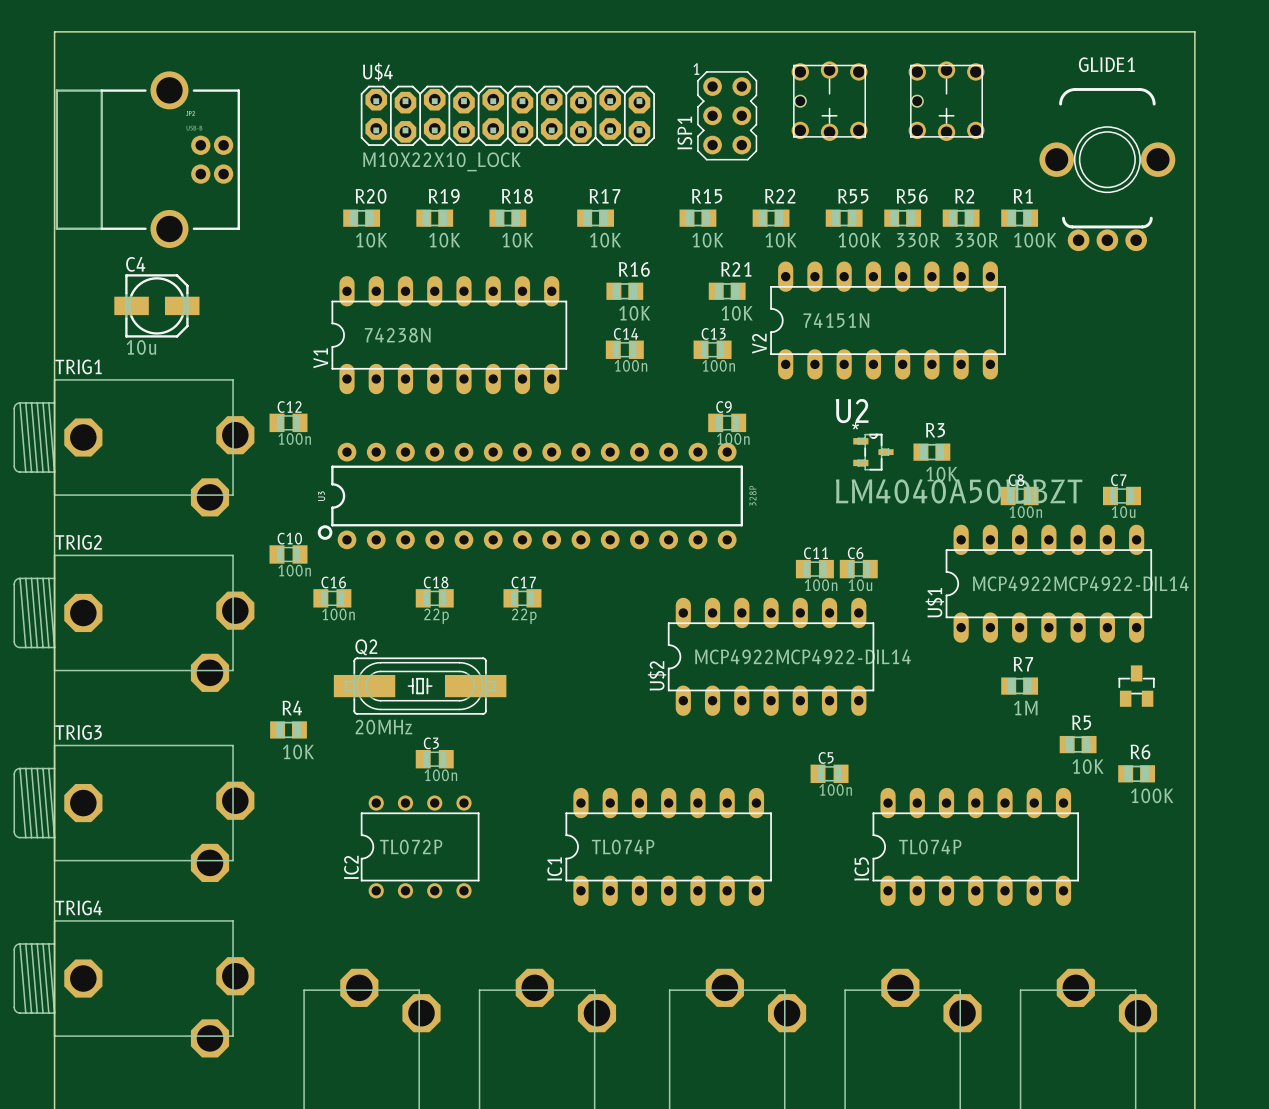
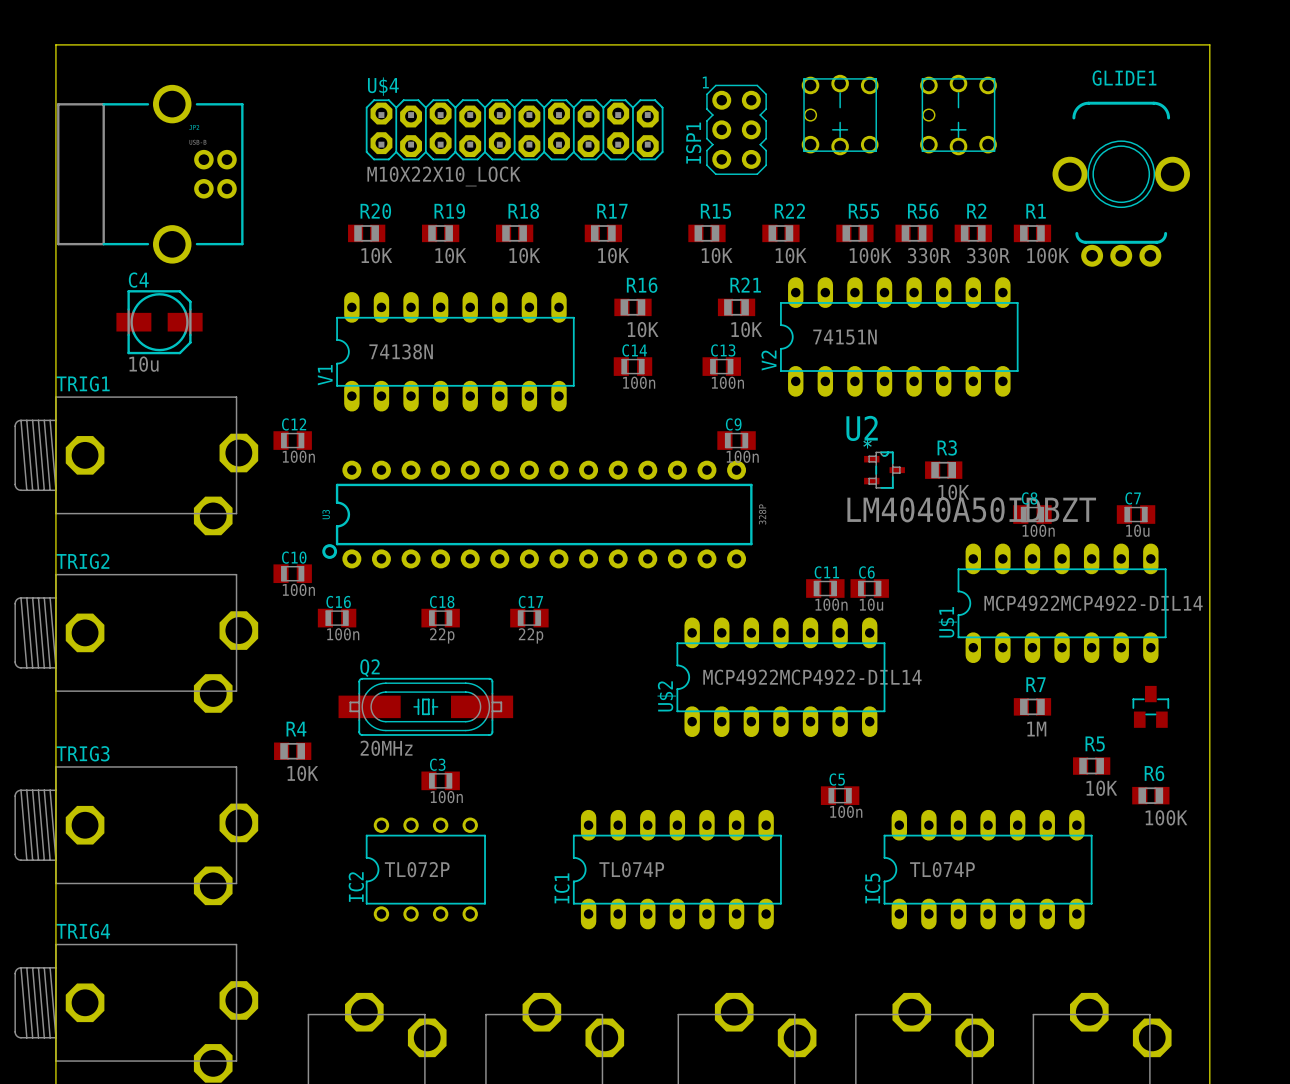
V1 value: 74238N (397, 335) -> 74138N (401, 351)

